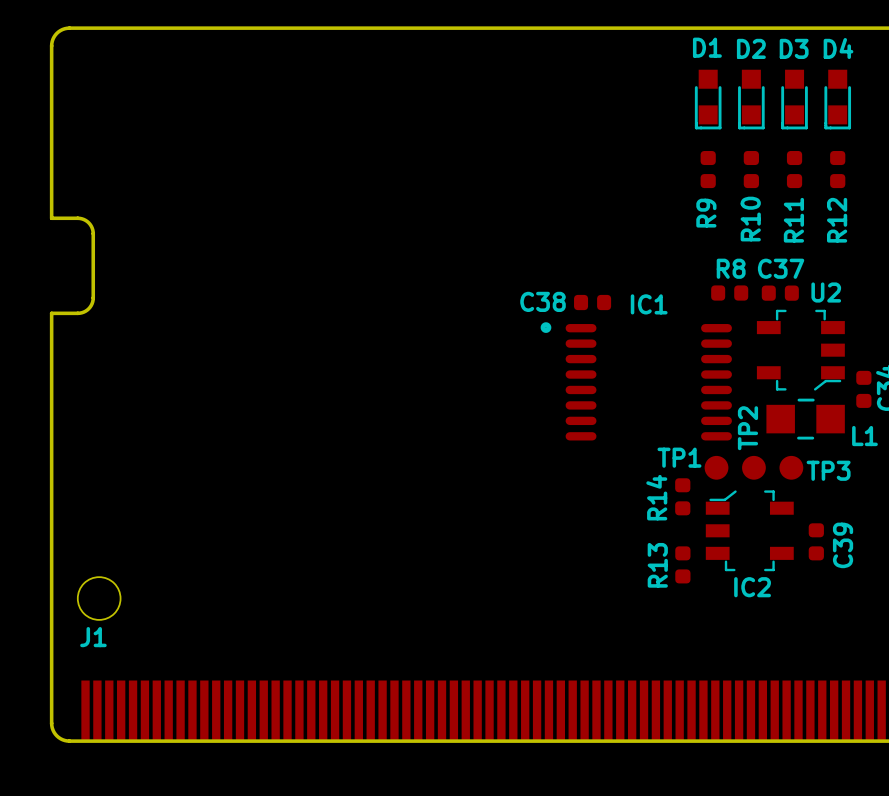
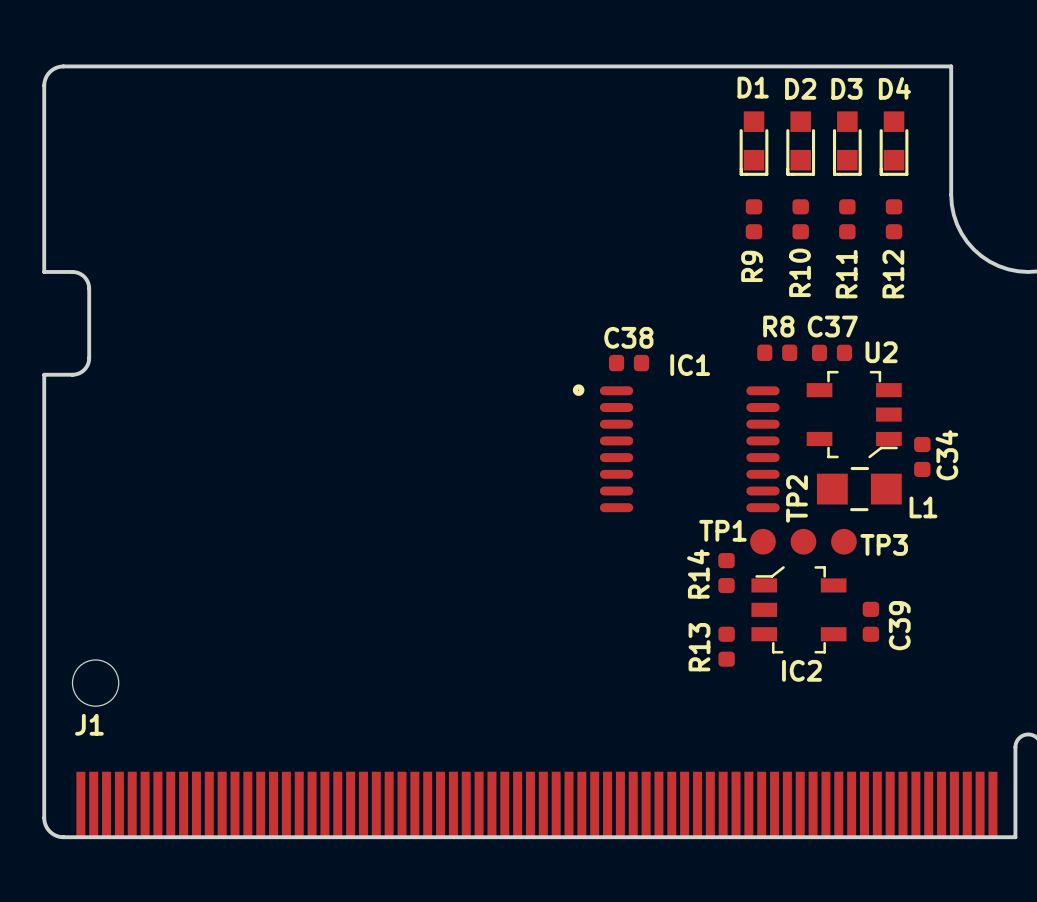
C38 name position: C38 (543, 301) -> C38 (628, 337)

